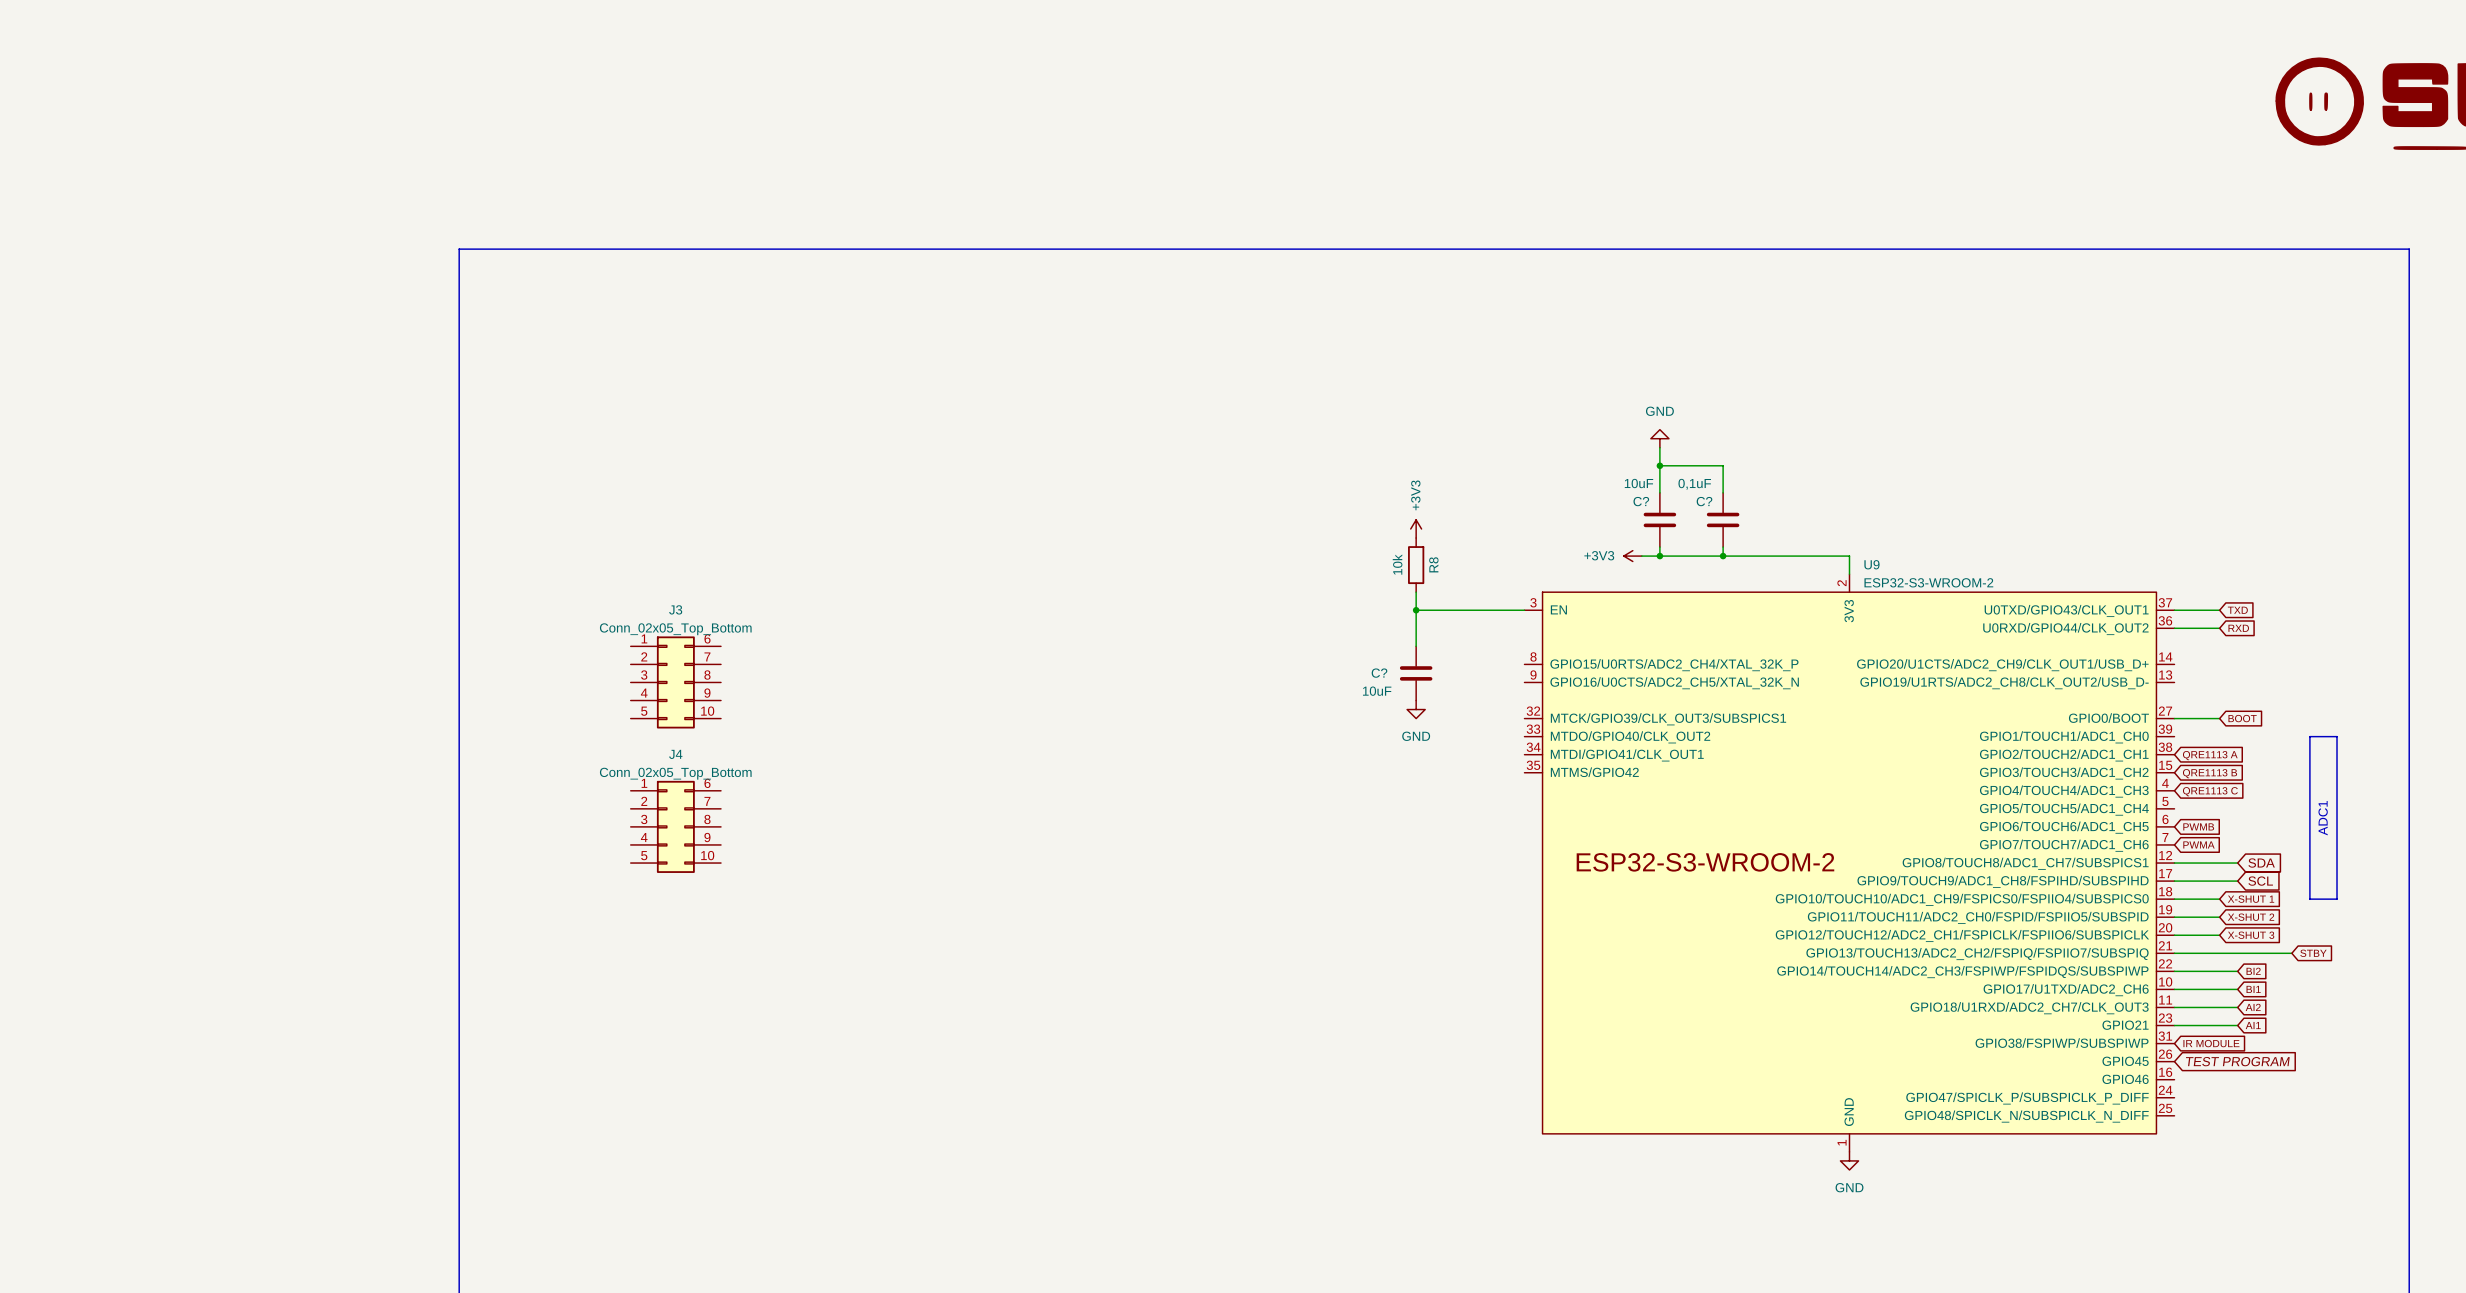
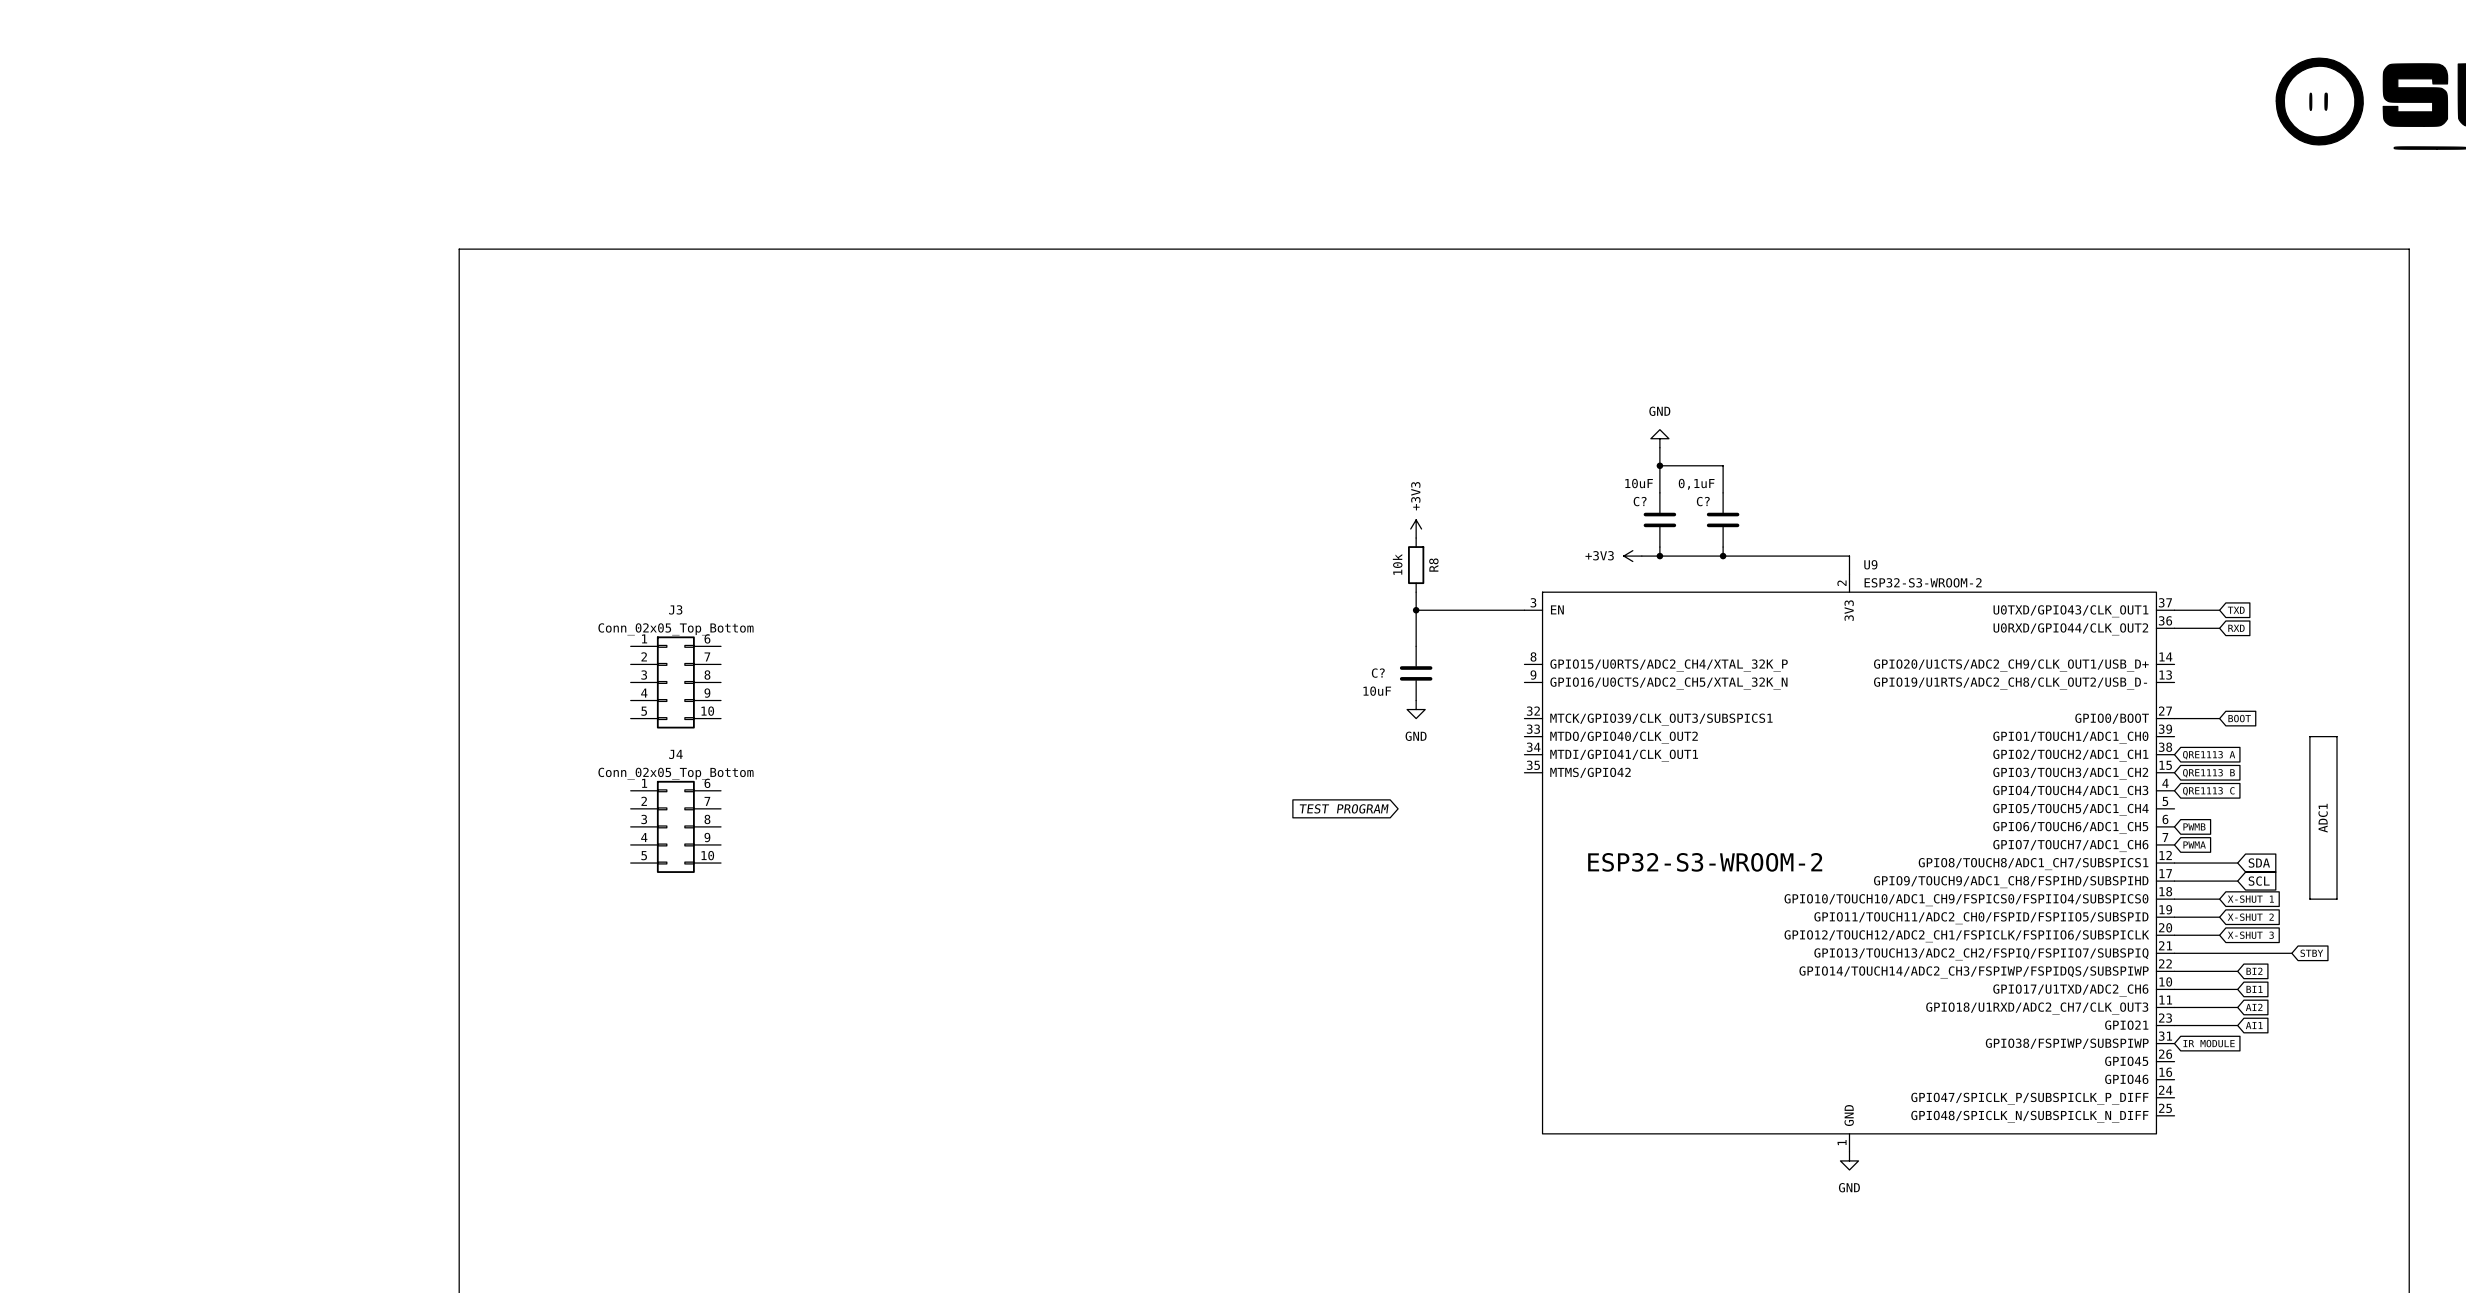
global label: none -> TEST PROGRAM (1344, 808)
global label: TEST PROGRAM (2237, 1061) -> none

